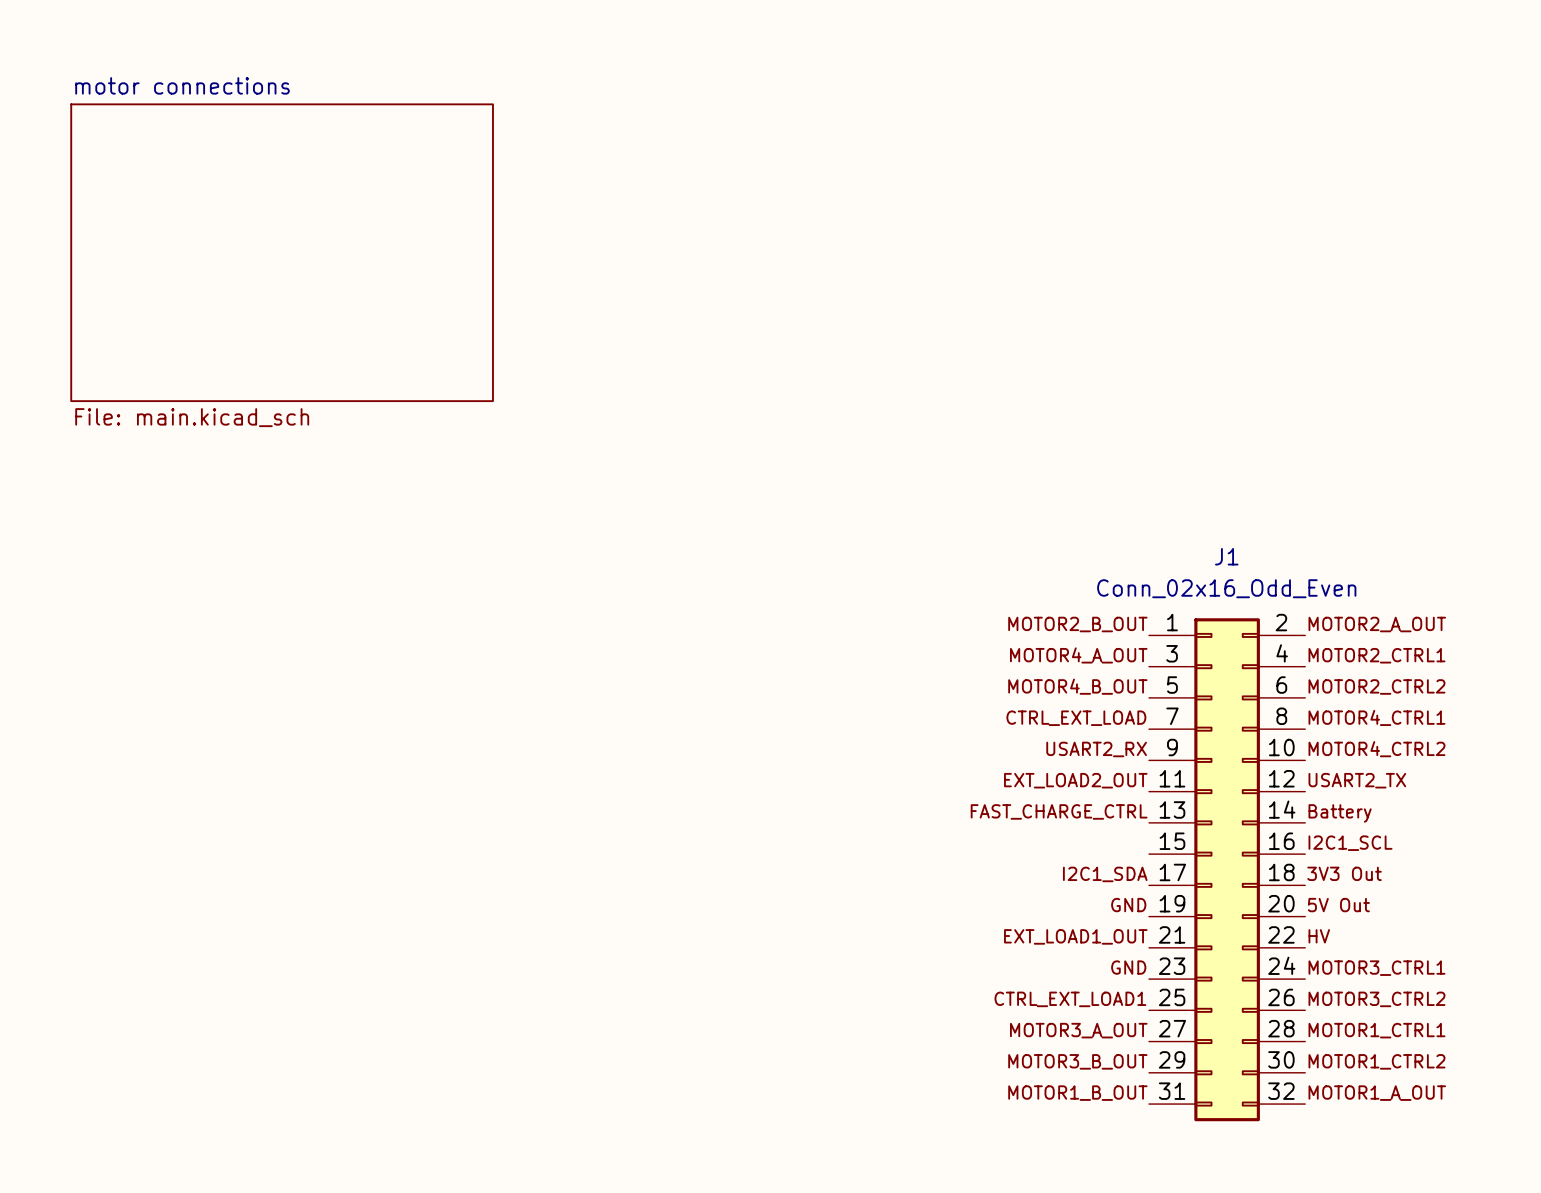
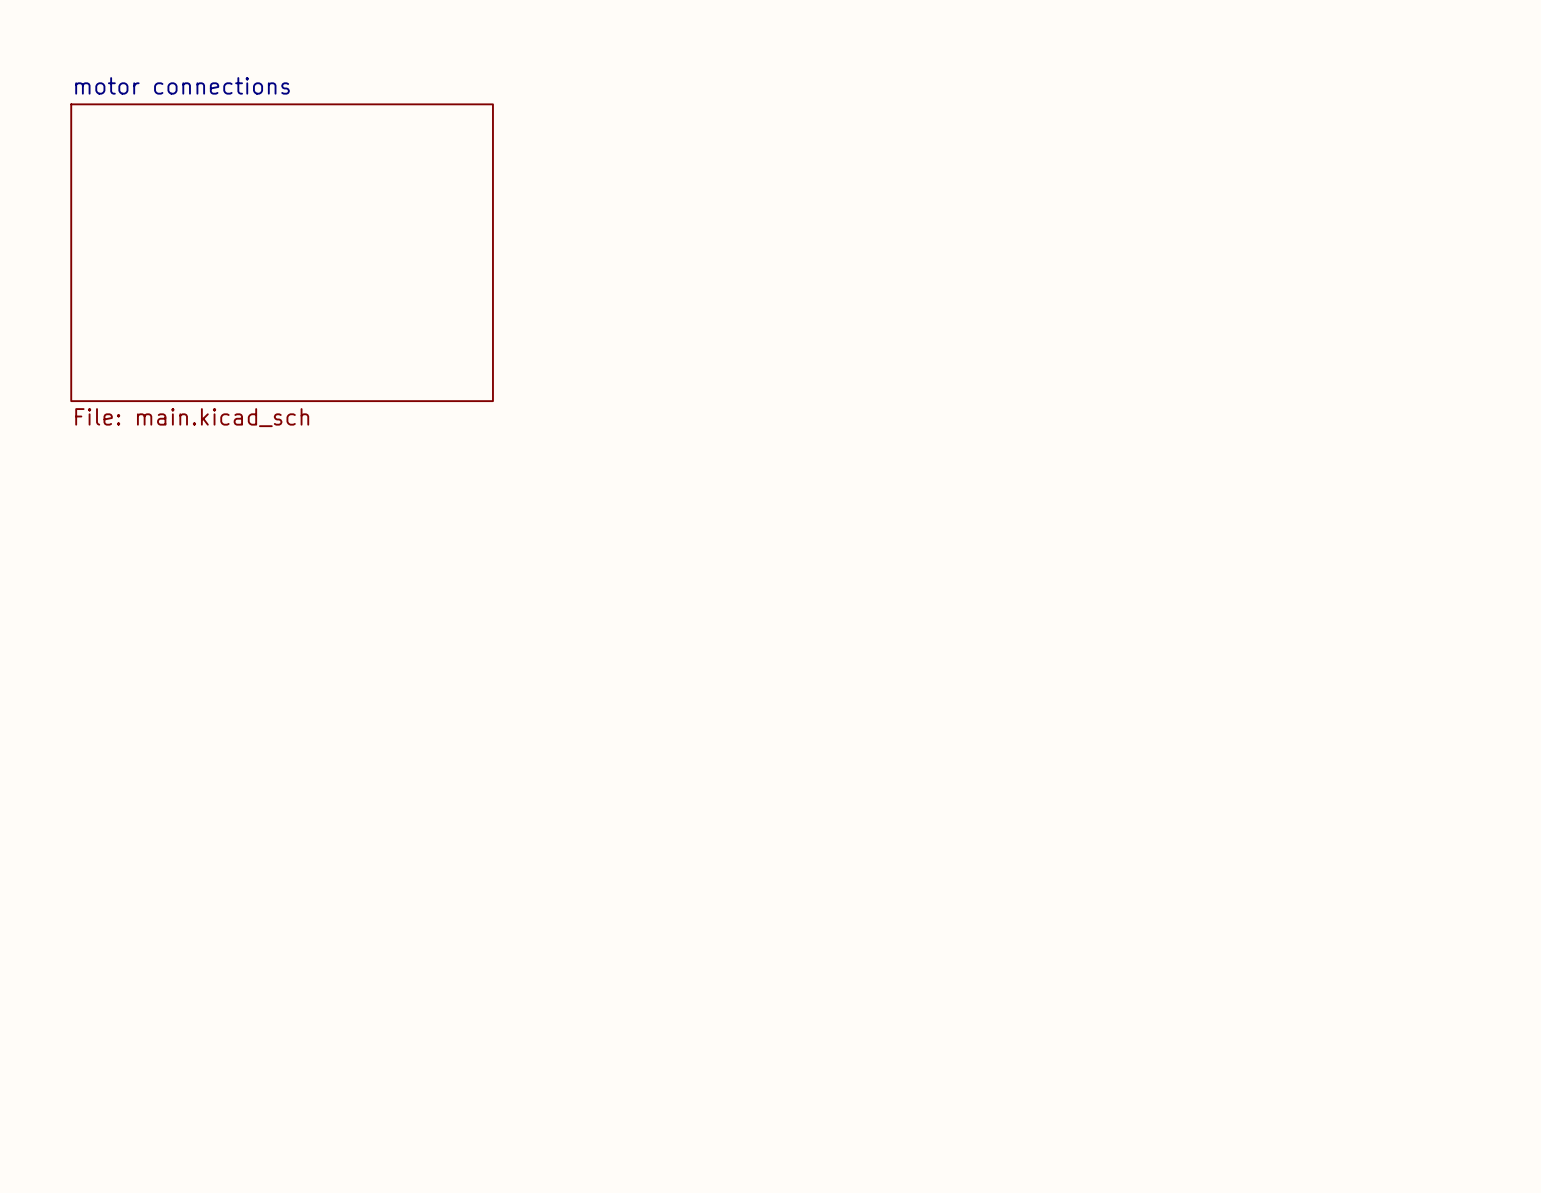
label: MOTOR2_B_OUT (1077, 624) -> none
label: MOTOR2_A_OUT (1377, 624) -> none
label: MOTOR4_A_OUT (1078, 655) -> none
label: MOTOR2_CTRL1 (1376, 655) -> none
label: MOTOR4_B_OUT (1077, 686) -> none
label: MOTOR2_CTRL2 (1376, 686) -> none
label: MOTOR4_CTRL1 (1376, 717) -> none
label: CTRL_EXT_LOAD (1076, 718) -> none
label: USART2_RX (1096, 749) -> none
label: MOTOR4_CTRL2 (1376, 749) -> none
label: EXT_LOAD2_OUT (1075, 780) -> none
label: USART2_TX (1357, 780) -> none
label: FAST_CHARGE_CTRL (1059, 811) -> none
label: Battery (1340, 813) -> none
label: I2C1_SCL (1350, 843) -> none
J1: Conn_02x16_Odd_Even (1227, 869) -> none
label: 3V3 Out (1344, 873) -> none
label: I2C1_SDA (1105, 874) -> none
label: GND (1128, 905) -> none
label: 5V Out (1338, 905) -> none
label: EXT_LOAD1_OUT (1075, 936) -> none
label: HV (1319, 936) -> none
label: GND (1128, 967) -> none
label: MOTOR3_CTRL1 (1376, 968) -> none
label: CTRL_EXT_LOAD1 (1070, 999) -> none
label: MOTOR3_CTRL2 (1376, 999) -> none
label: MOTOR3_A_OUT (1078, 1030) -> none
label: MOTOR1_CTRL1 (1376, 1030) -> none
label: MOTOR3_B_OUT (1077, 1061) -> none
label: MOTOR1_CTRL2 (1376, 1061) -> none
label: MOTOR1_B_OUT (1077, 1093) -> none
label: MOTOR1_A_OUT (1377, 1093) -> none

